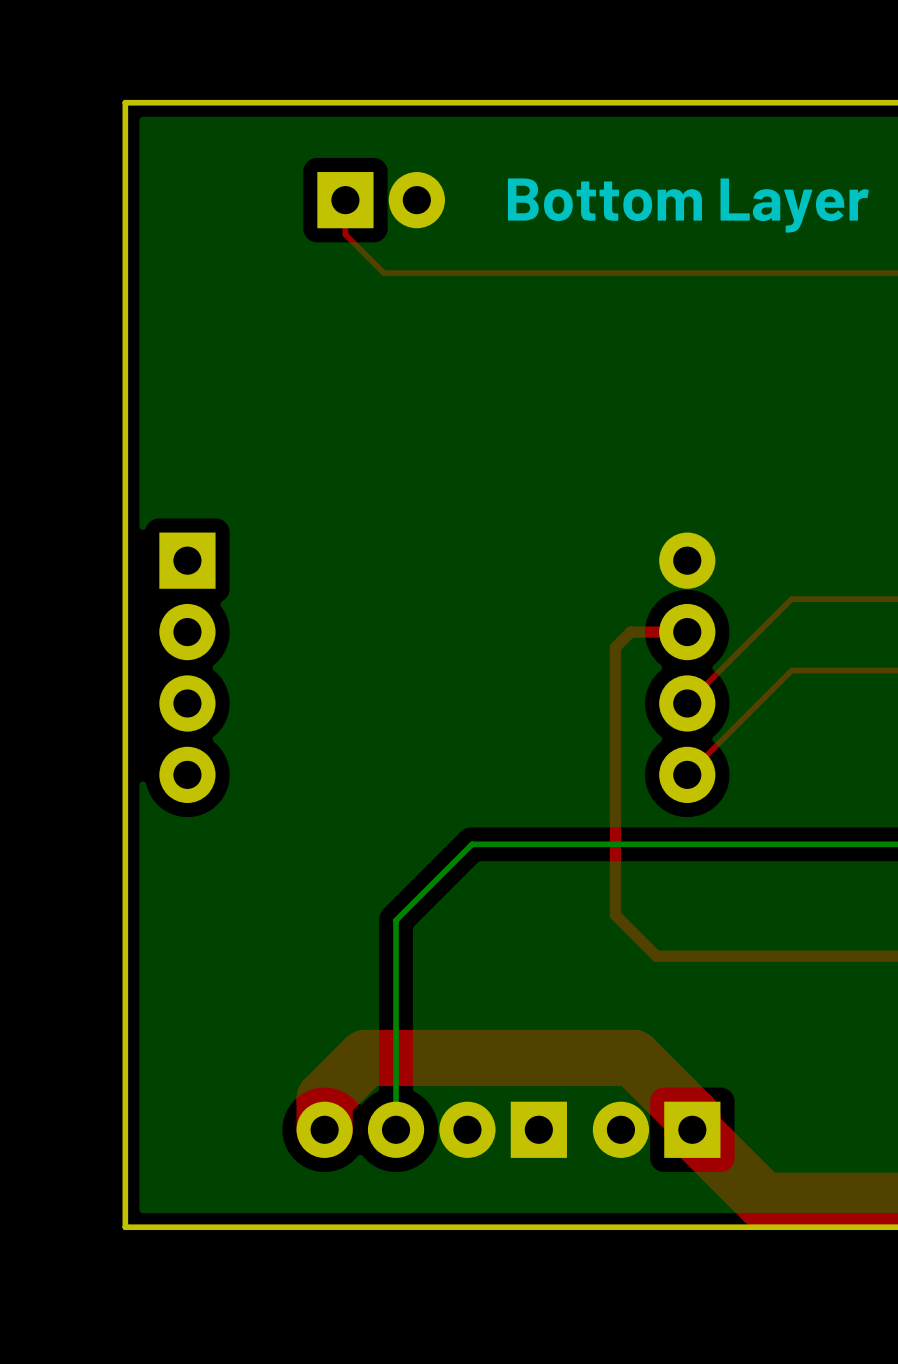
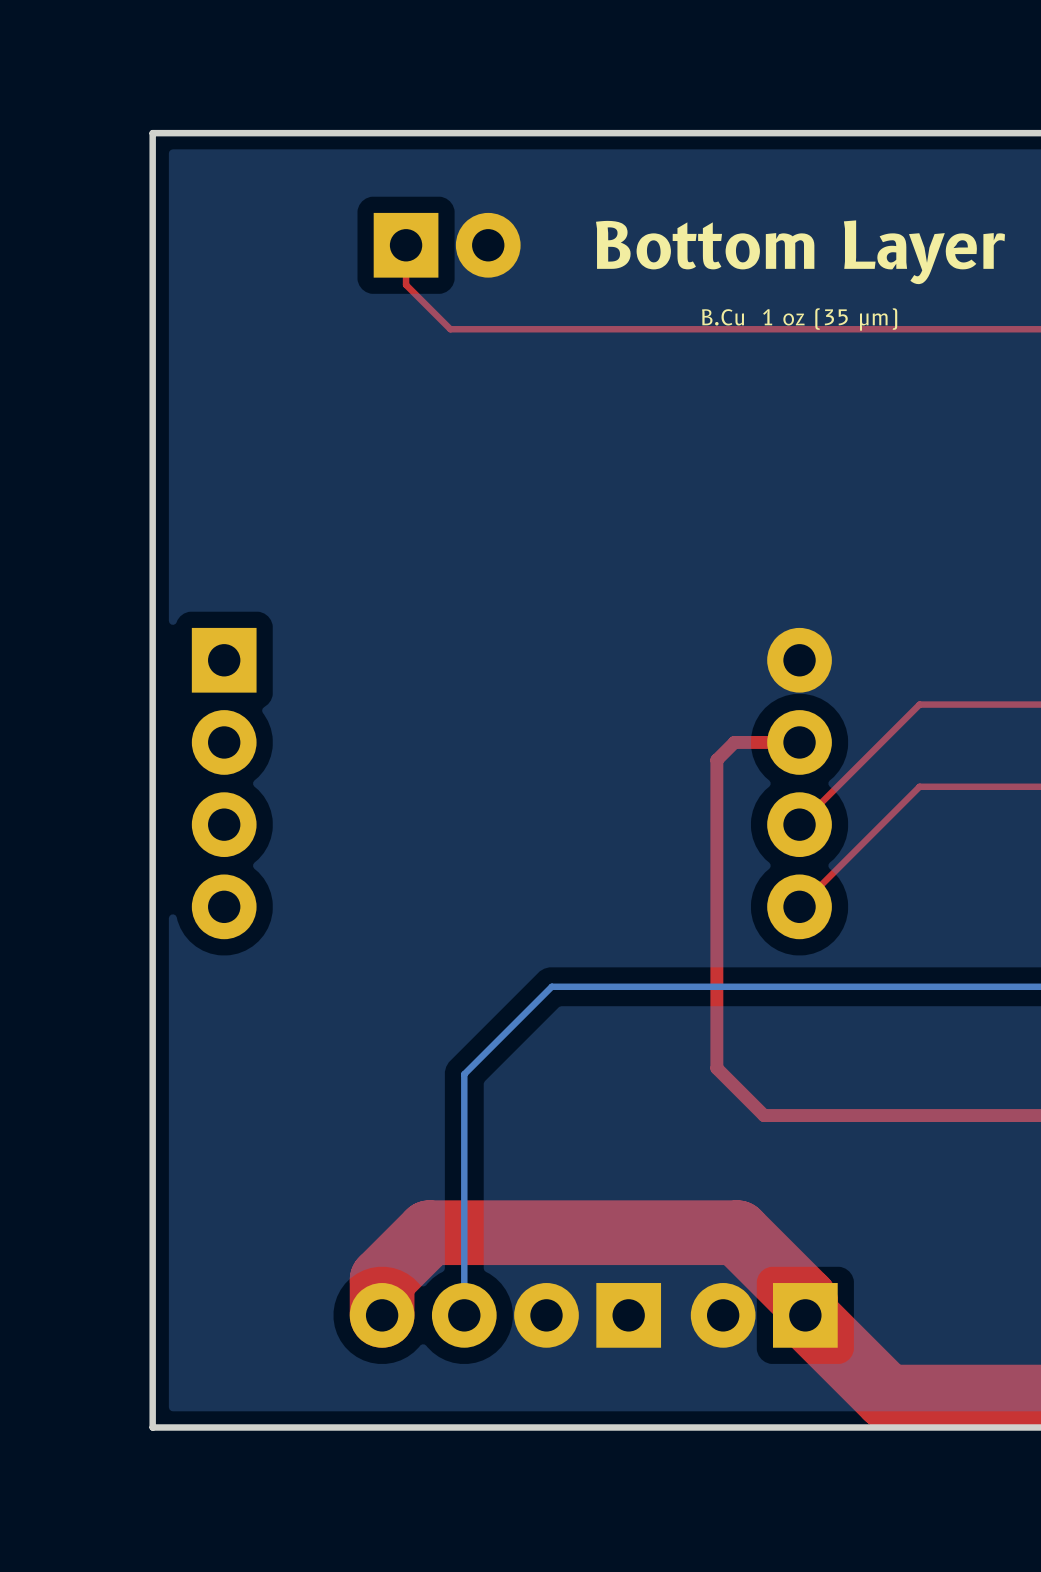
text: none -> B.Cu 1 oz (35 μm) (799, 319)

